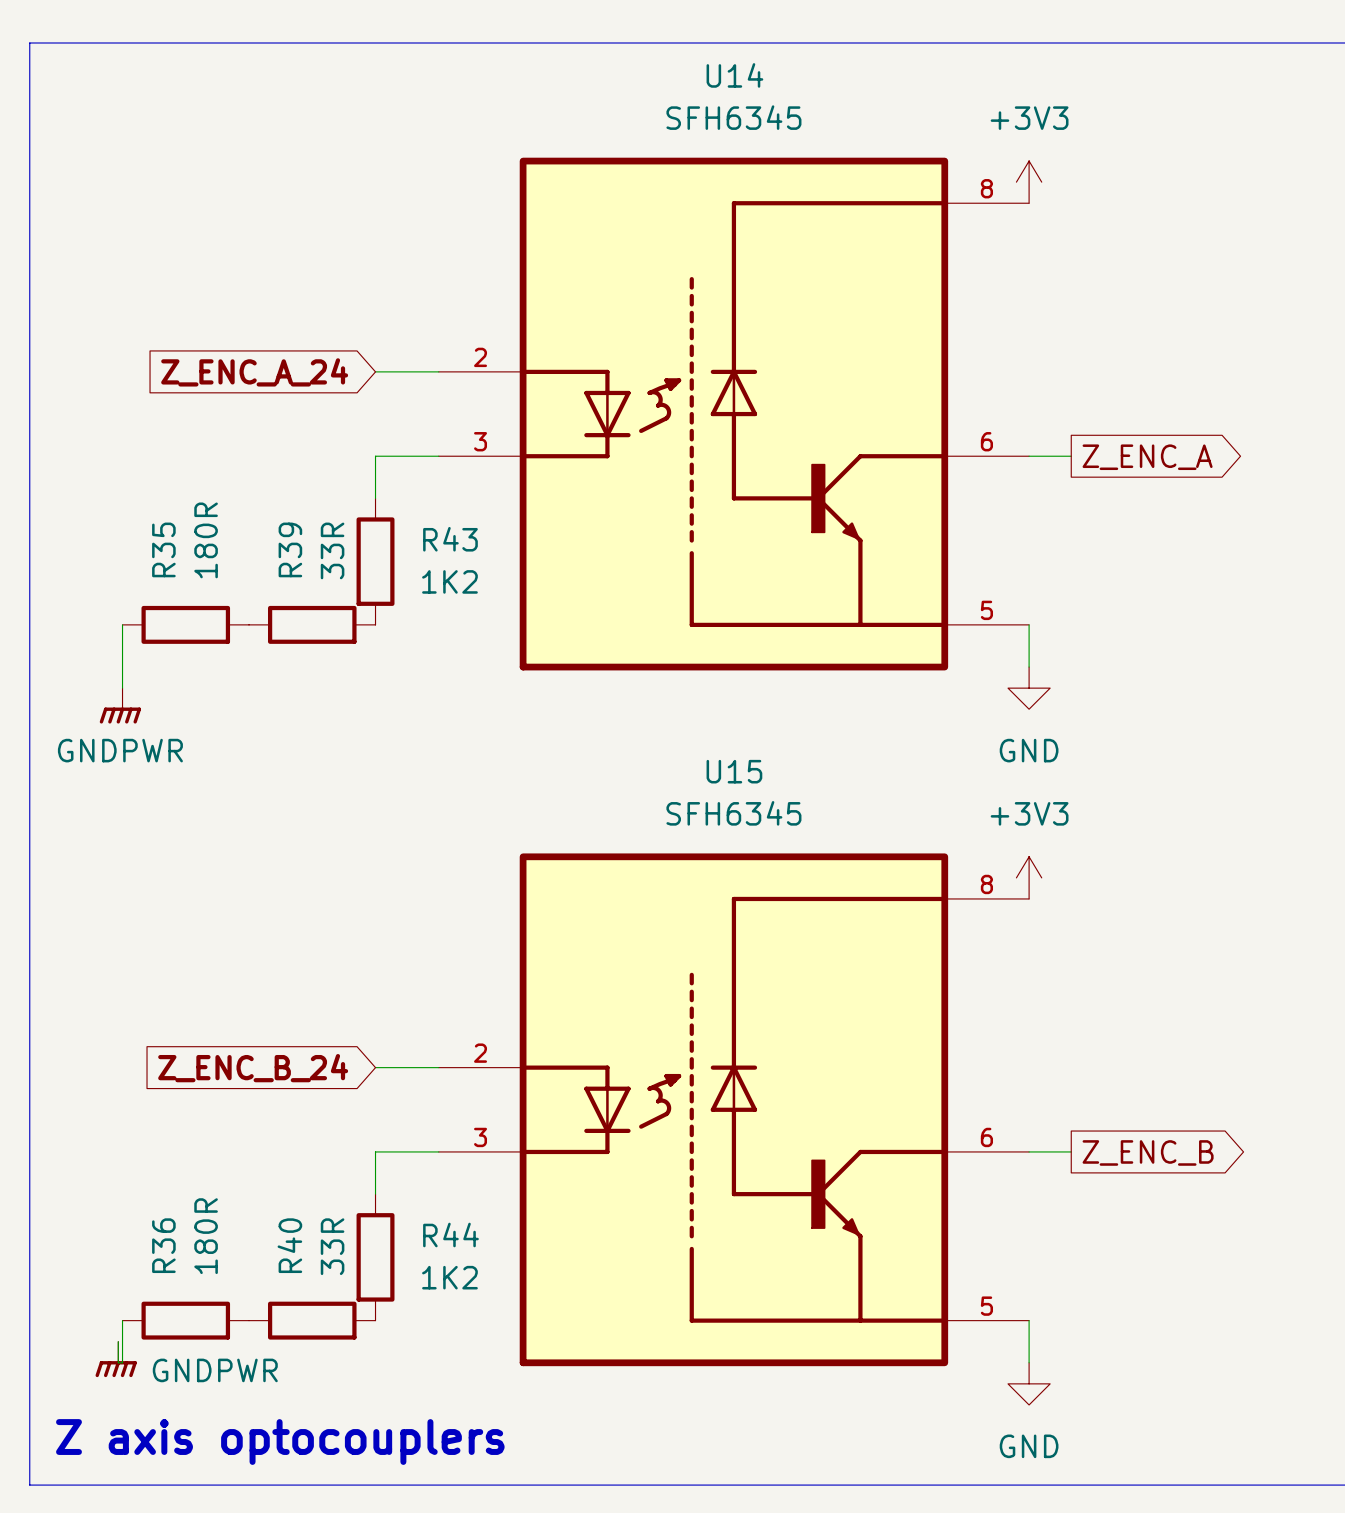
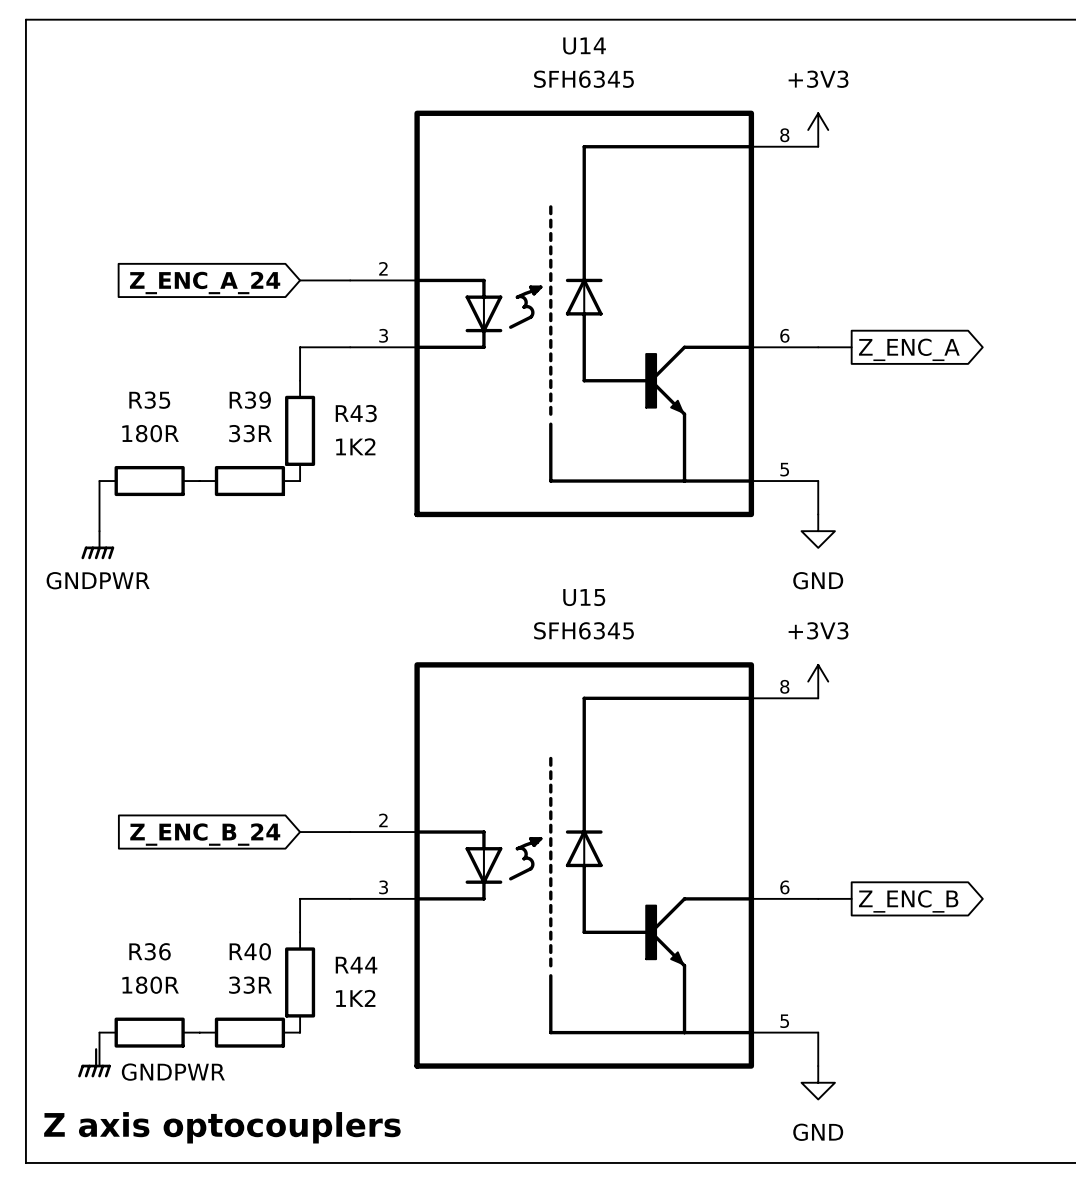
R35 value rotation: 0° (206, 540) -> 90° clockwise (150, 433)
R35 name rotation: 0° (163, 549) -> 90° clockwise (149, 400)
R39 name rotation: 0° (290, 549) -> 90° clockwise (250, 400)
R39 value rotation: 0° (332, 550) -> 90° clockwise (250, 433)
R36 value rotation: 0° (206, 1236) -> 90° clockwise (150, 985)
R36 name rotation: 0° (163, 1245) -> 90° clockwise (150, 951)
R40 name rotation: 0° (289, 1245) -> 90° clockwise (250, 951)
R40 value rotation: 0° (332, 1246) -> 90° clockwise (250, 985)

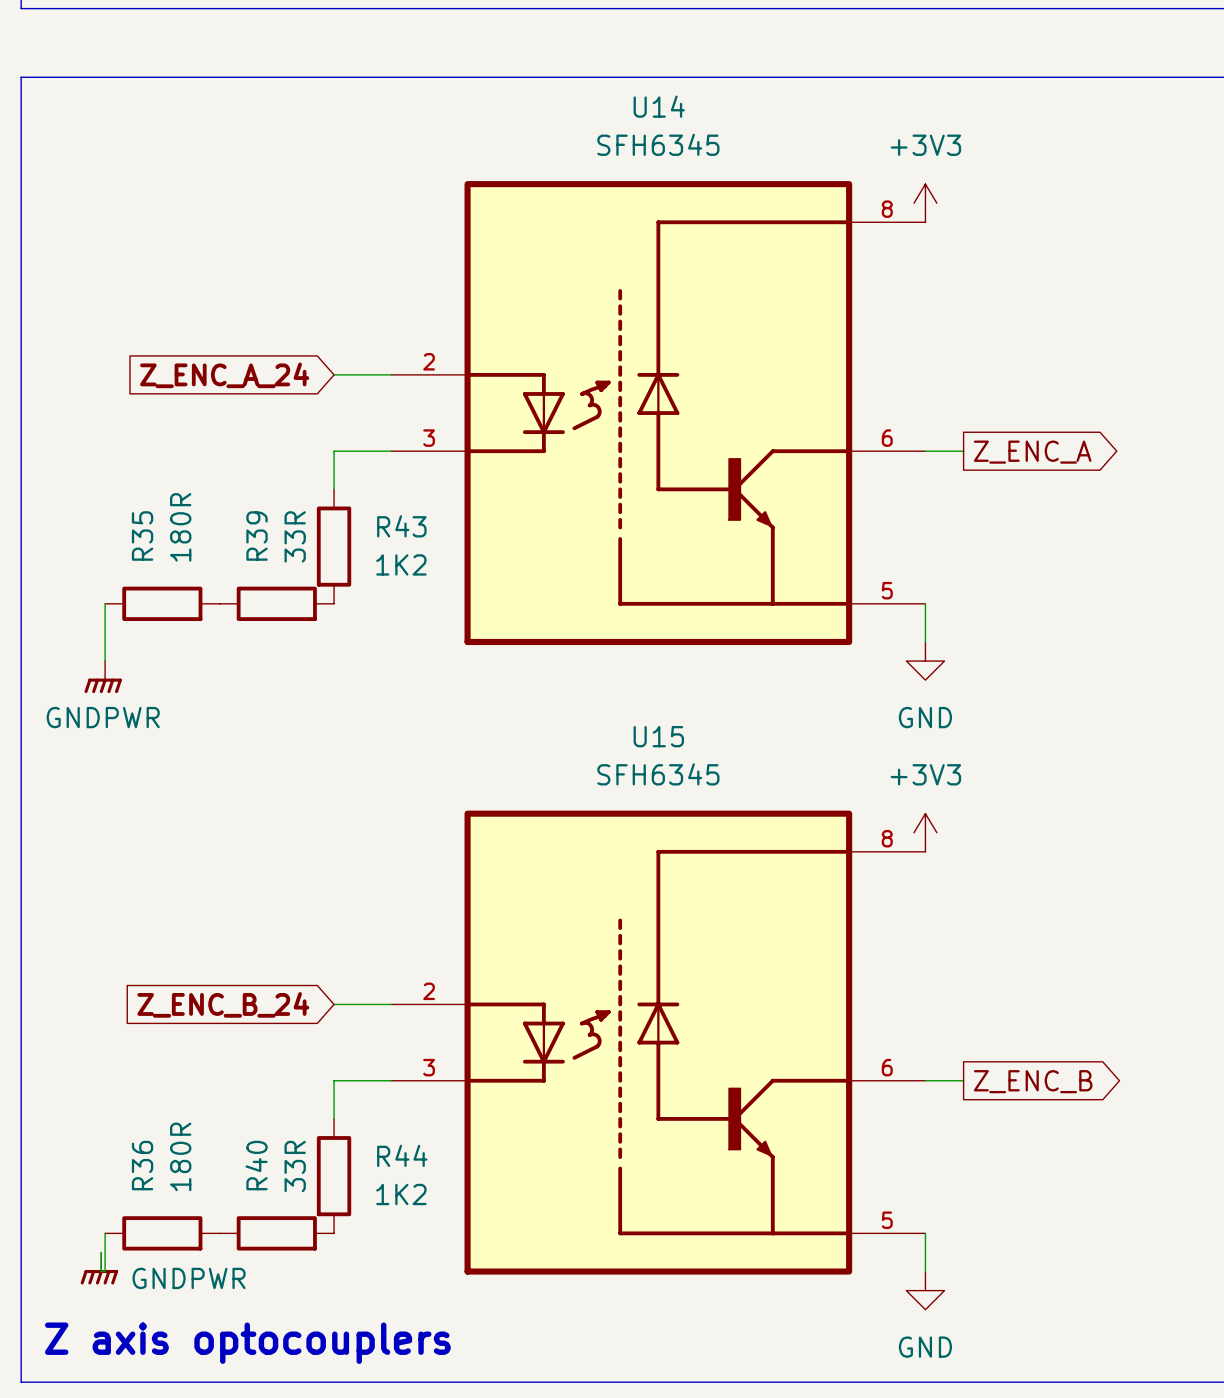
R35 name rotation: 0° (149, 400) -> 90° counterclockwise (142, 536)
R39 name rotation: 0° (250, 400) -> 90° counterclockwise (257, 536)
R35 value rotation: 0° (150, 433) -> 90° counterclockwise (180, 527)
R39 value rotation: 0° (250, 433) -> 90° counterclockwise (295, 536)
R36 name rotation: 0° (150, 951) -> 90° counterclockwise (142, 1165)
R40 name rotation: 0° (250, 951) -> 90° counterclockwise (256, 1165)
R36 value rotation: 0° (150, 985) -> 90° counterclockwise (180, 1156)
R40 value rotation: 0° (250, 985) -> 90° counterclockwise (295, 1166)

